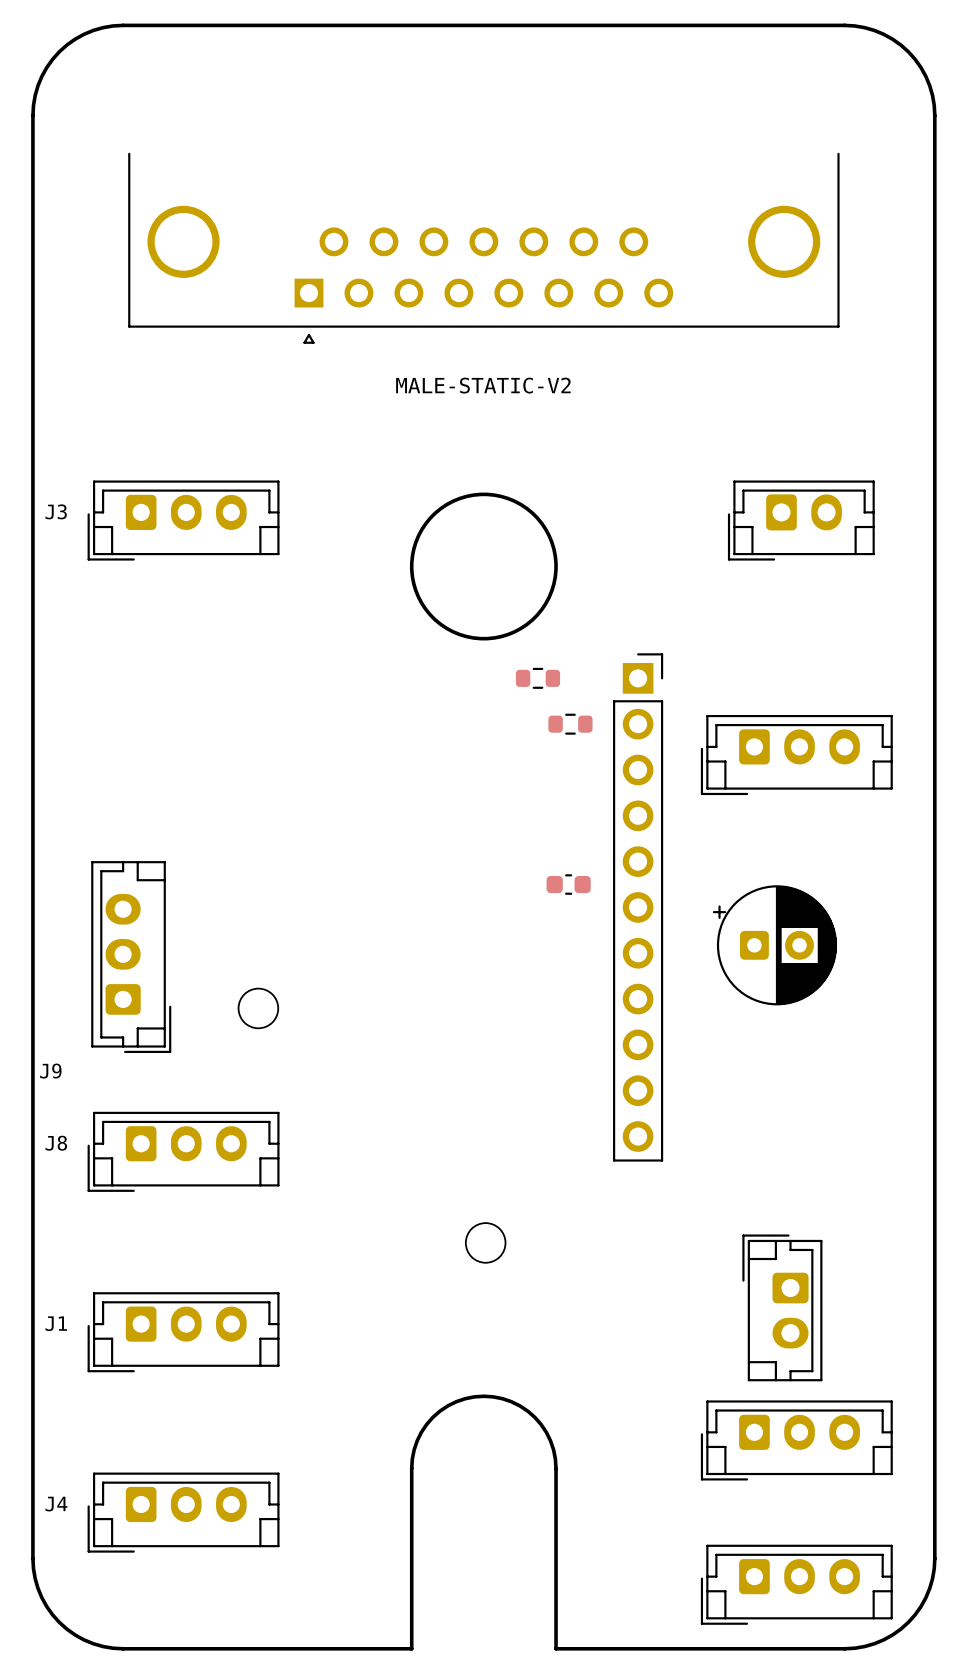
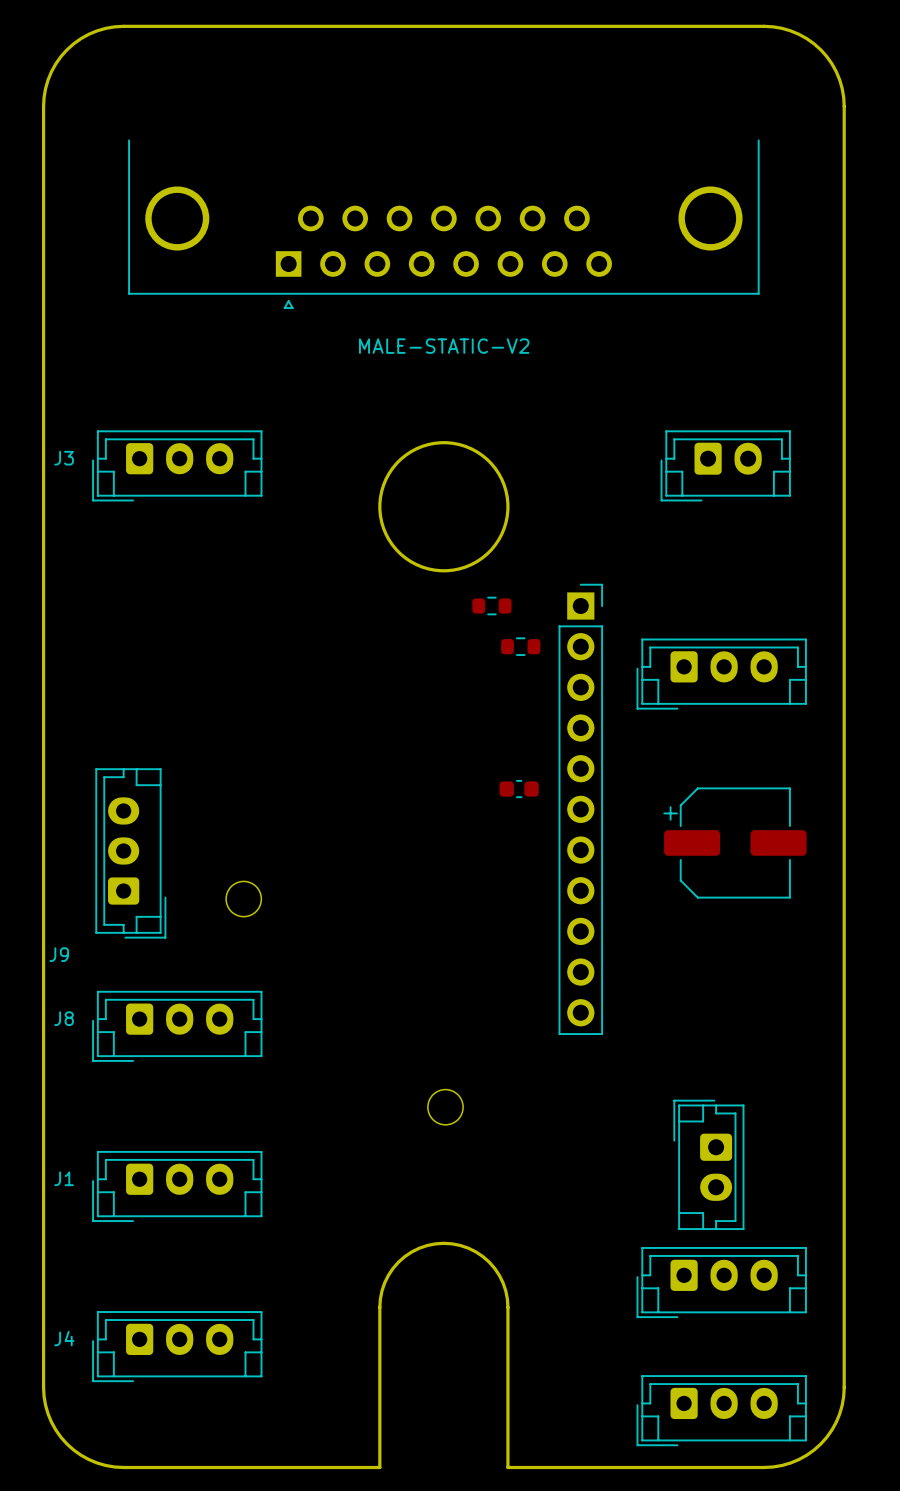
part: (774, 945) -> none
part: none -> (734, 843)

